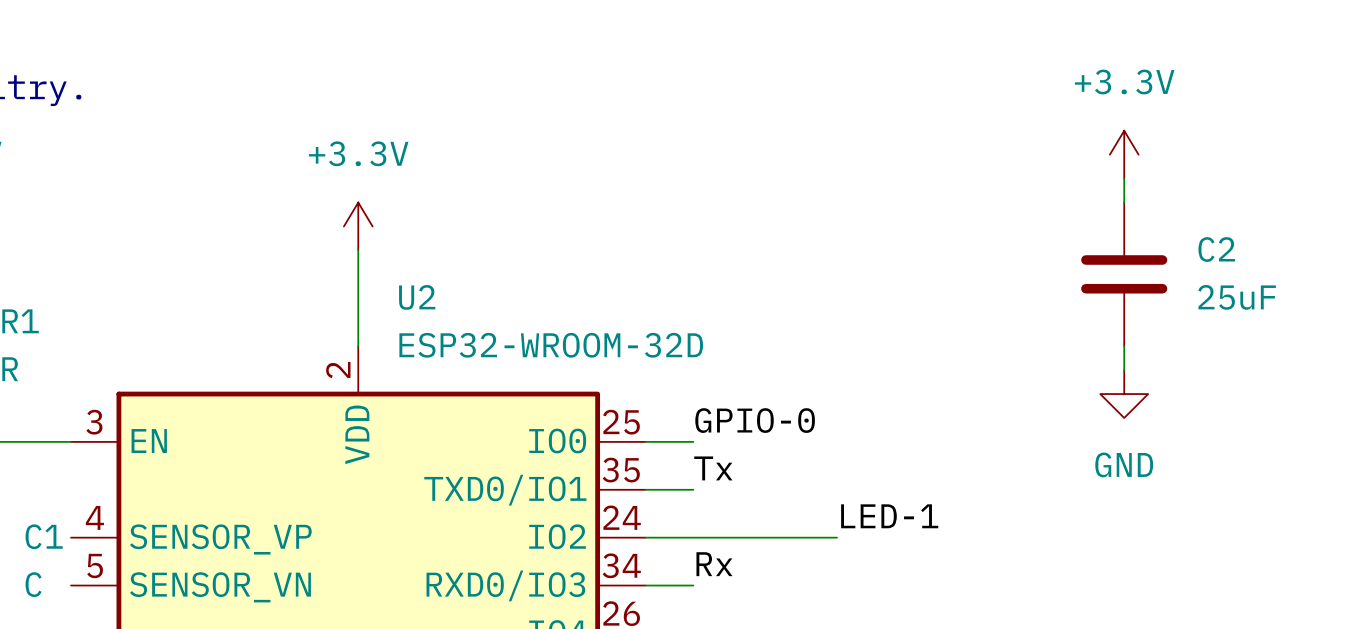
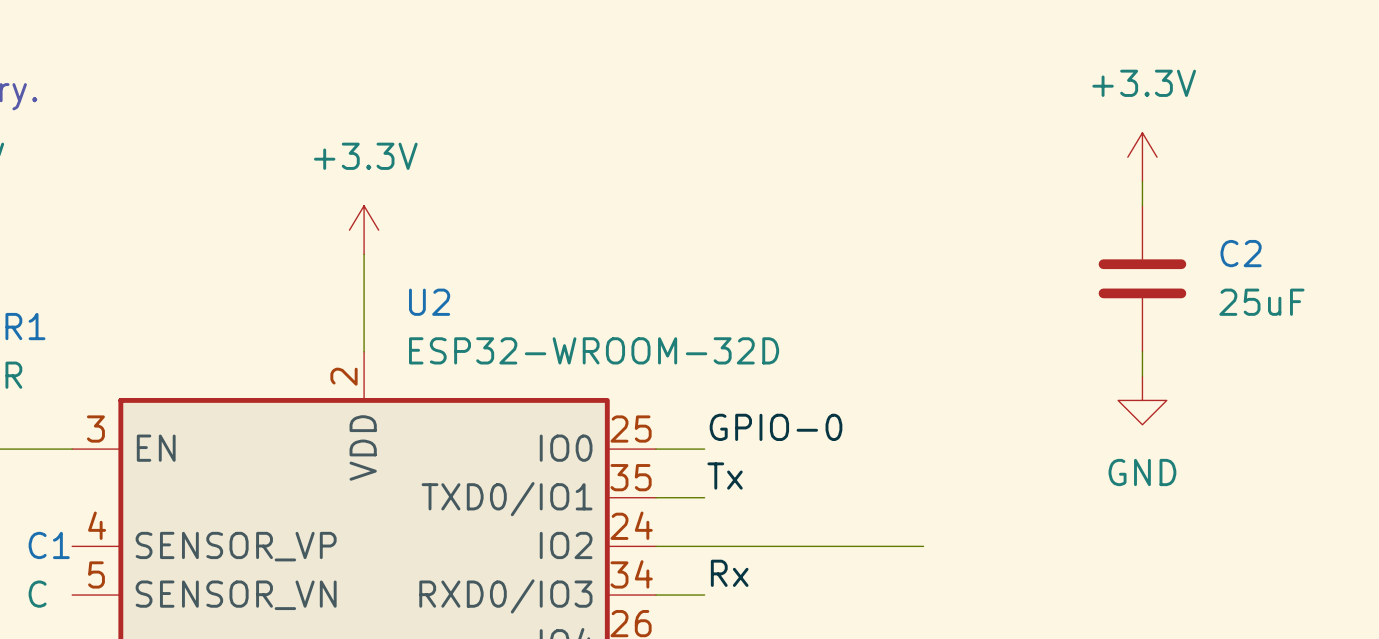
label: LED-1 (889, 516) -> none
wire: none -> (850, 546) (923, 546)

